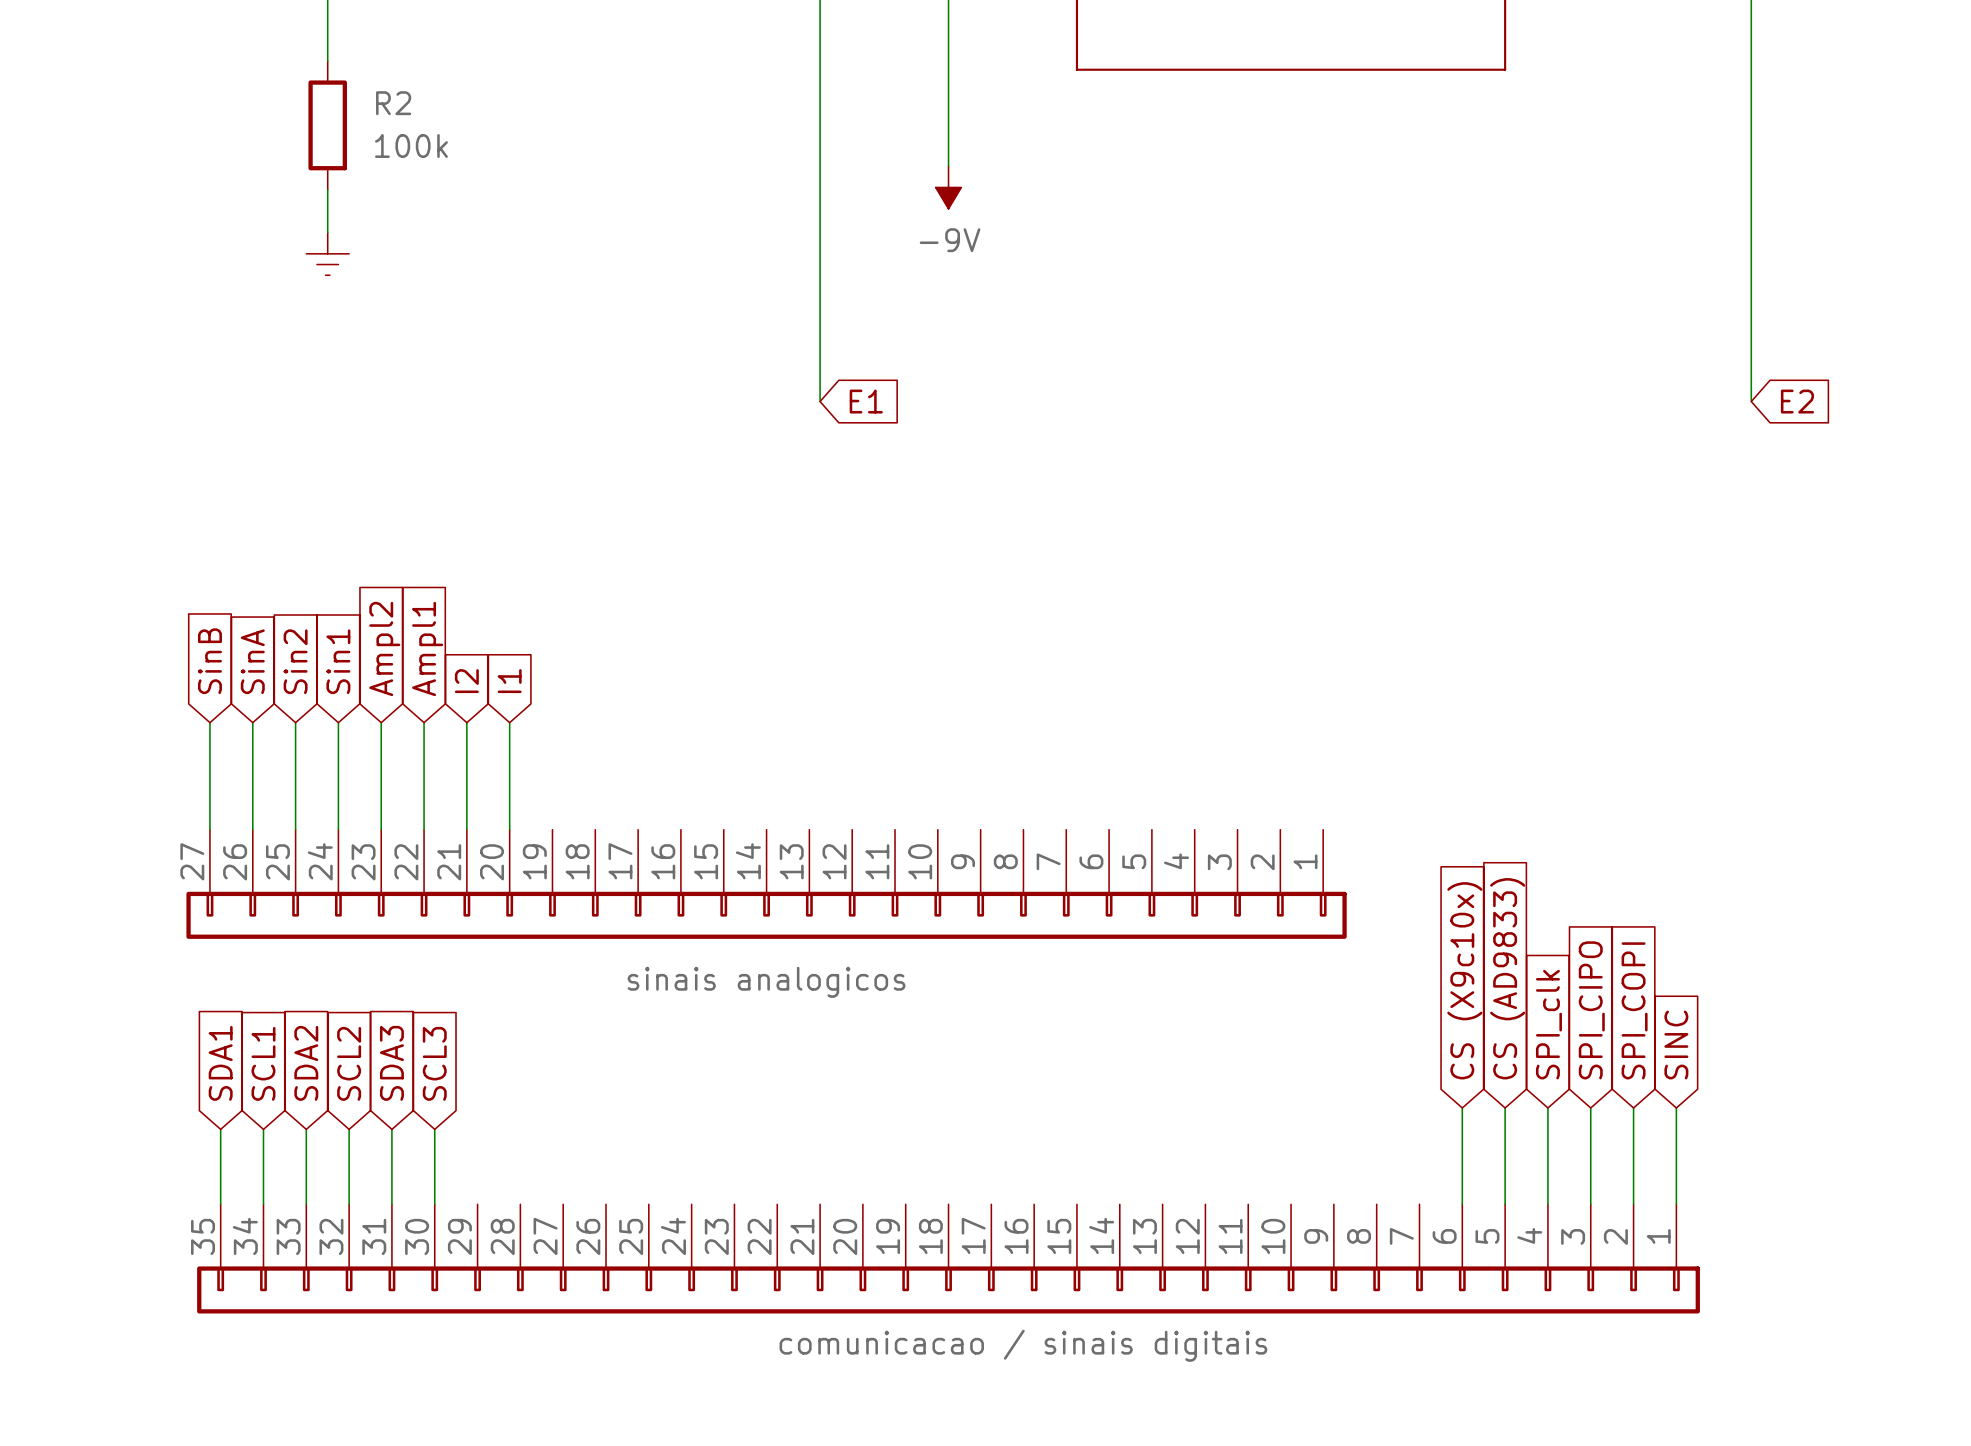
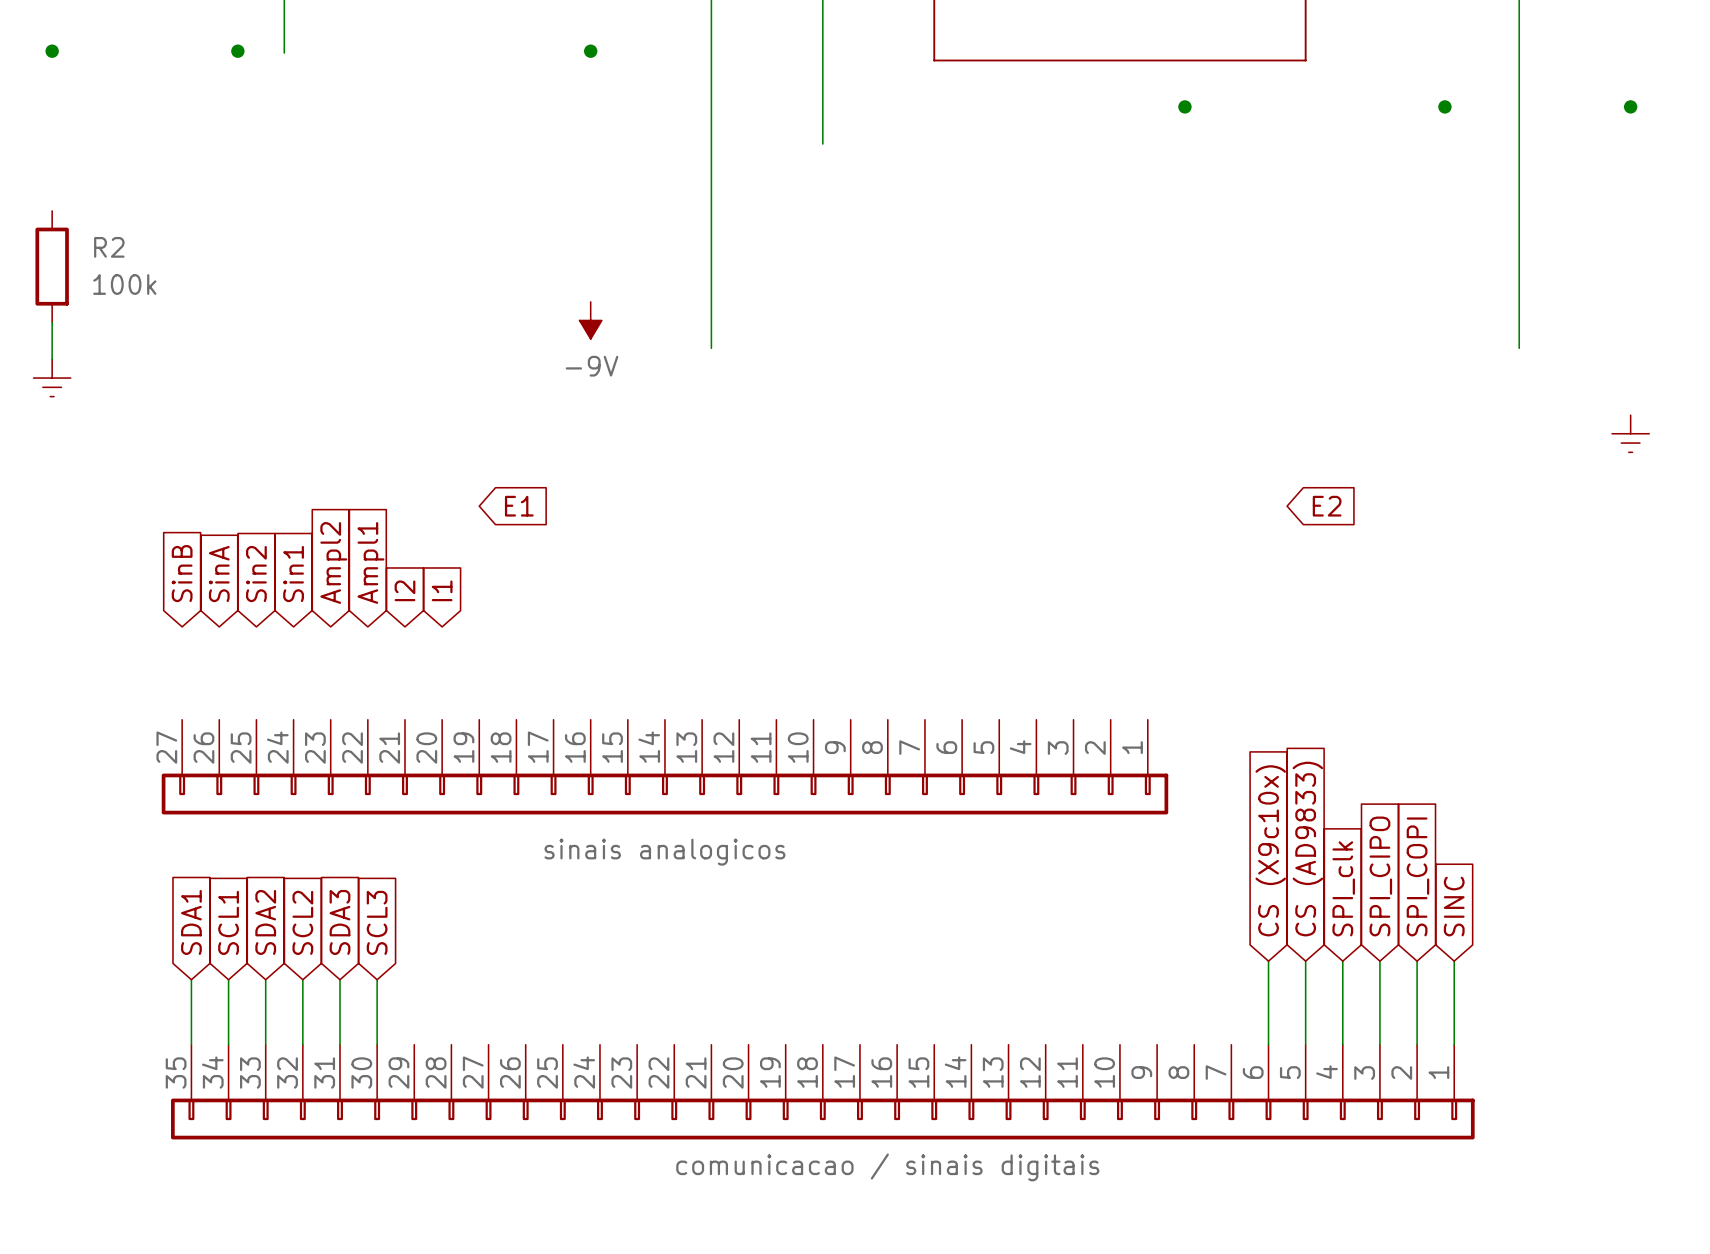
junction: none -> (52, 51)
junction: none -> (237, 51)
junction: none -> (590, 51)
junction: none -> (1184, 106)
junction: none -> (1444, 106)
junction: none -> (1630, 106)
R2 position: (327, 125) -> (52, 266)
power symbol position: -9V (948, 187) -> -9V (590, 320)
wire: (327, 189) (327, 232) -> (52, 322) (52, 359)
power symbol: (327, 253) -> none
global label position: E1 (866, 401) -> E1 (519, 506)
global label position: E2 (1797, 401) -> E2 (1327, 506)
power symbol: none -> (52, 378)
power symbol: none -> (1630, 433)
wire: (209, 722) (209, 829) -> none
wire: (252, 722) (252, 829) -> none
wire: (295, 722) (295, 829) -> none
wire: (338, 722) (338, 829) -> none
wire: (381, 722) (381, 829) -> none
wire: (424, 722) (424, 829) -> none
wire: (466, 722) (466, 829) -> none
wire: (509, 722) (509, 829) -> none

